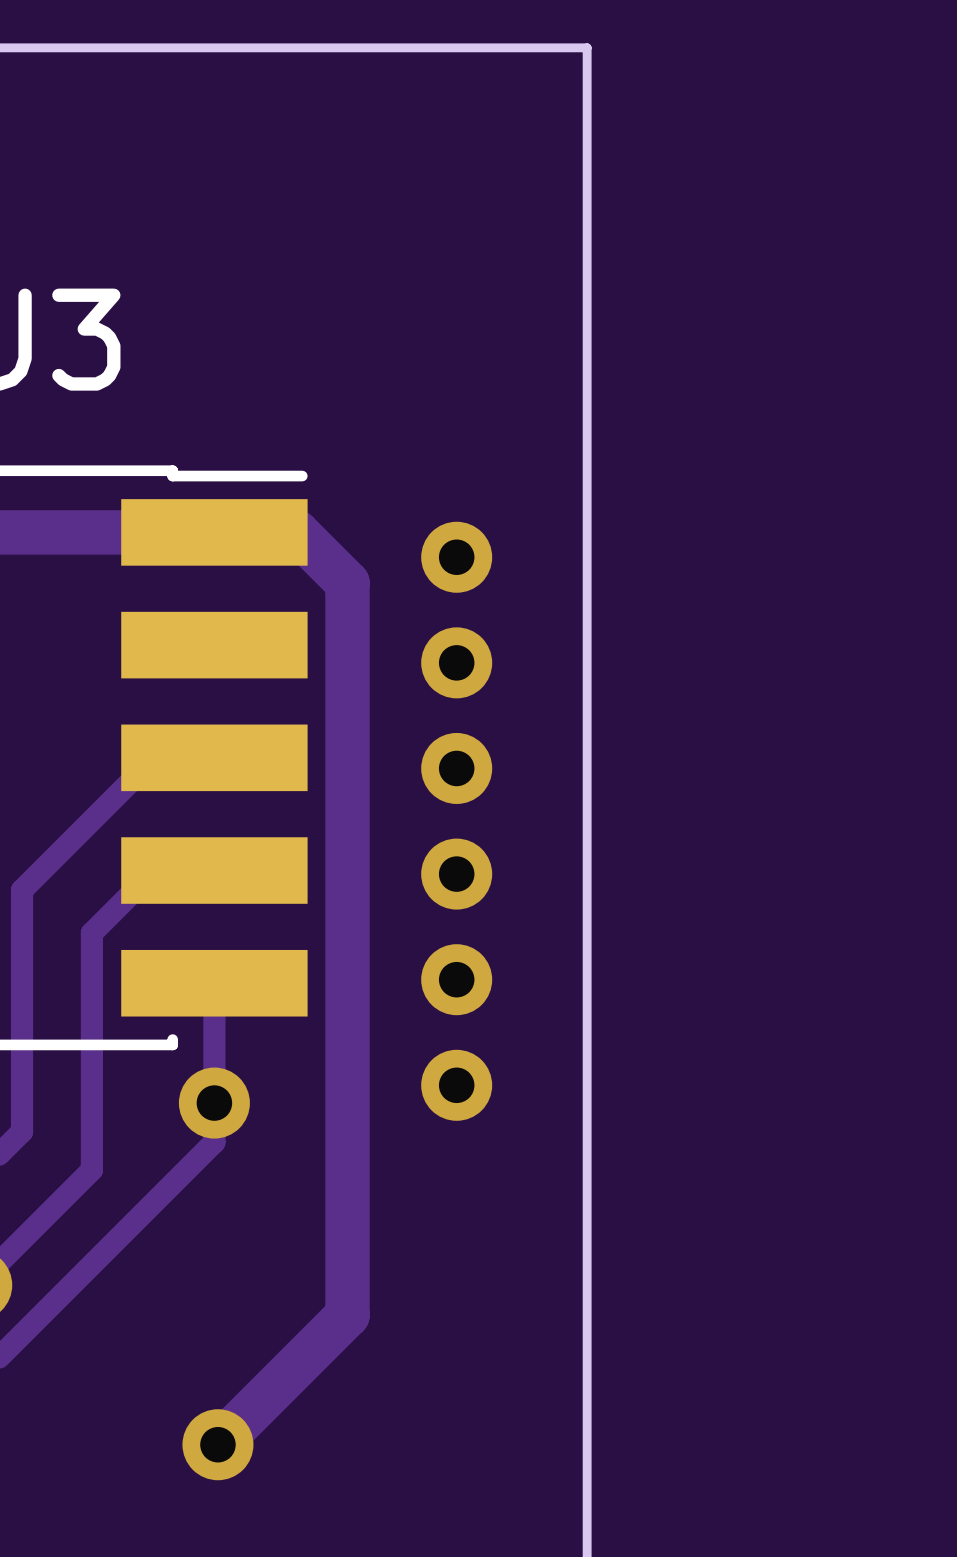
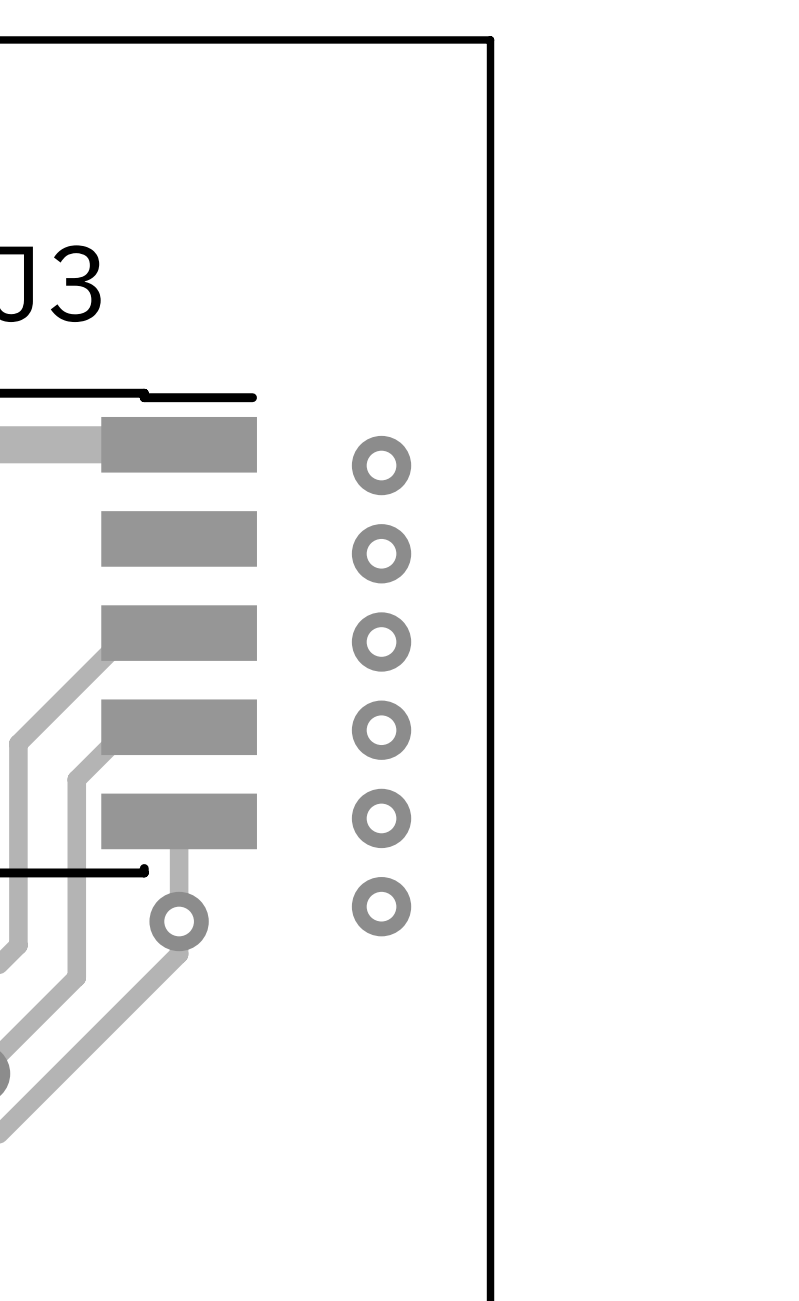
track: (214, 532) (296, 532) (347, 582) (347, 1315) (217, 1444) -> none
via: (217, 1444) -> none

